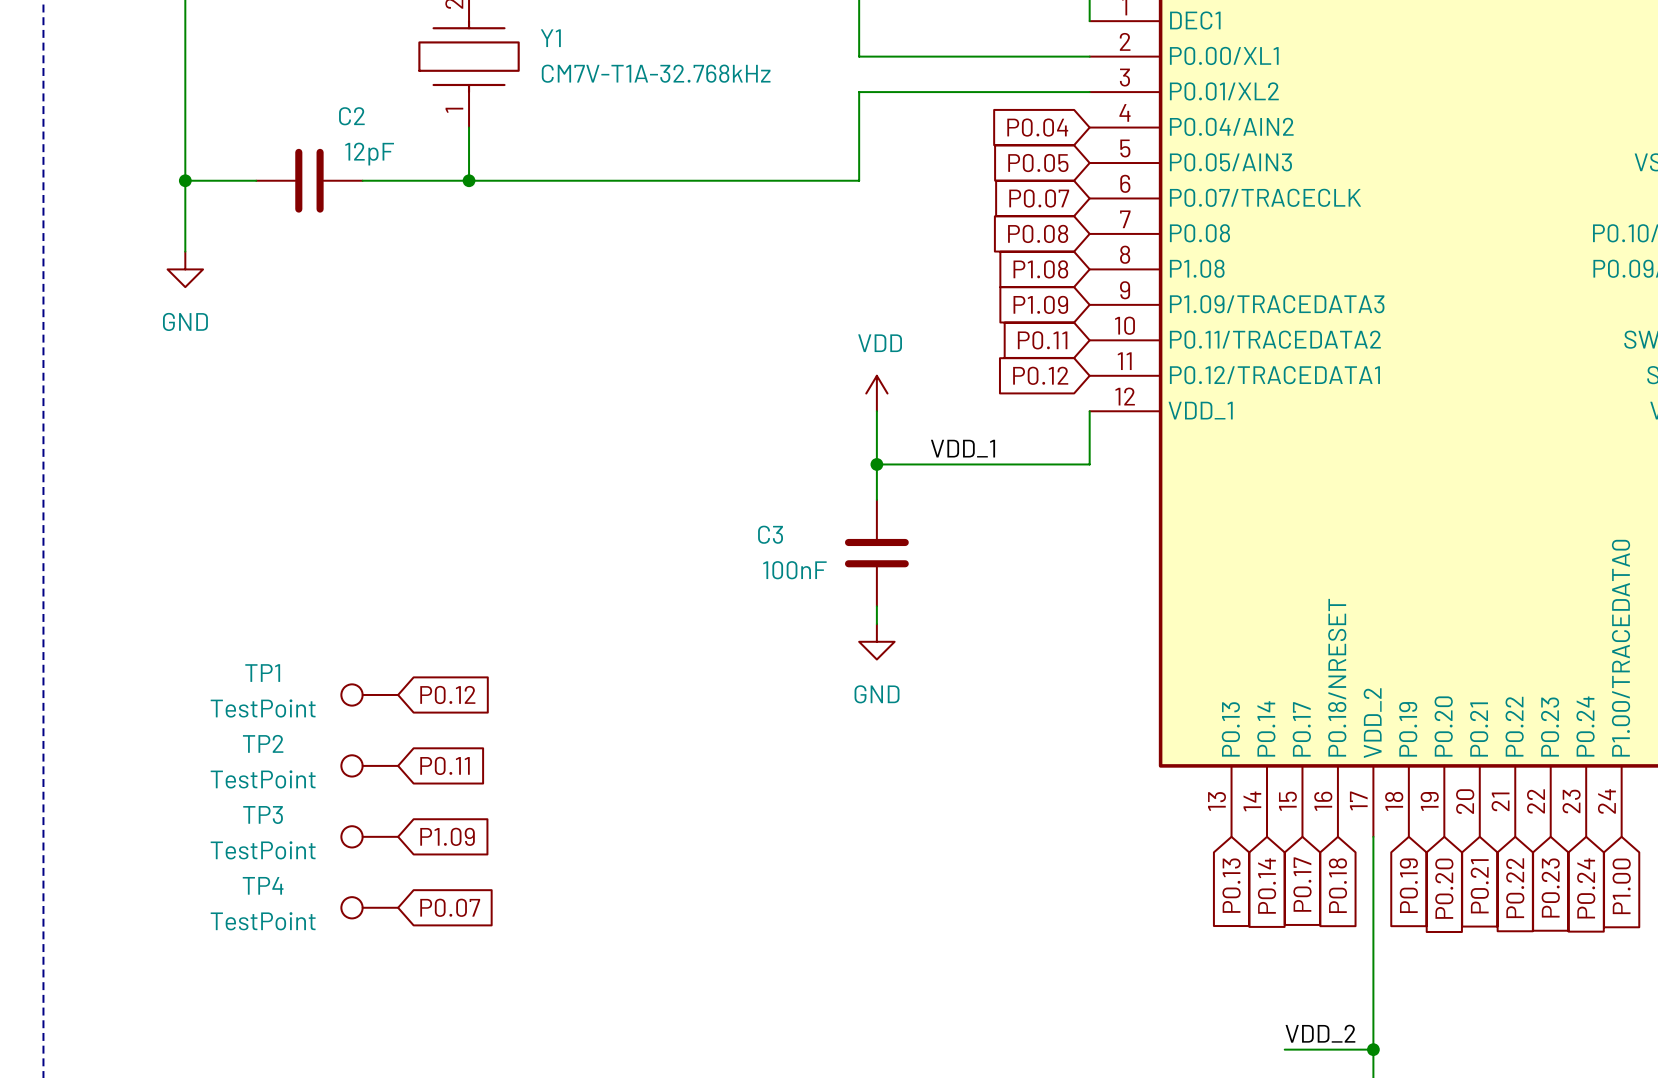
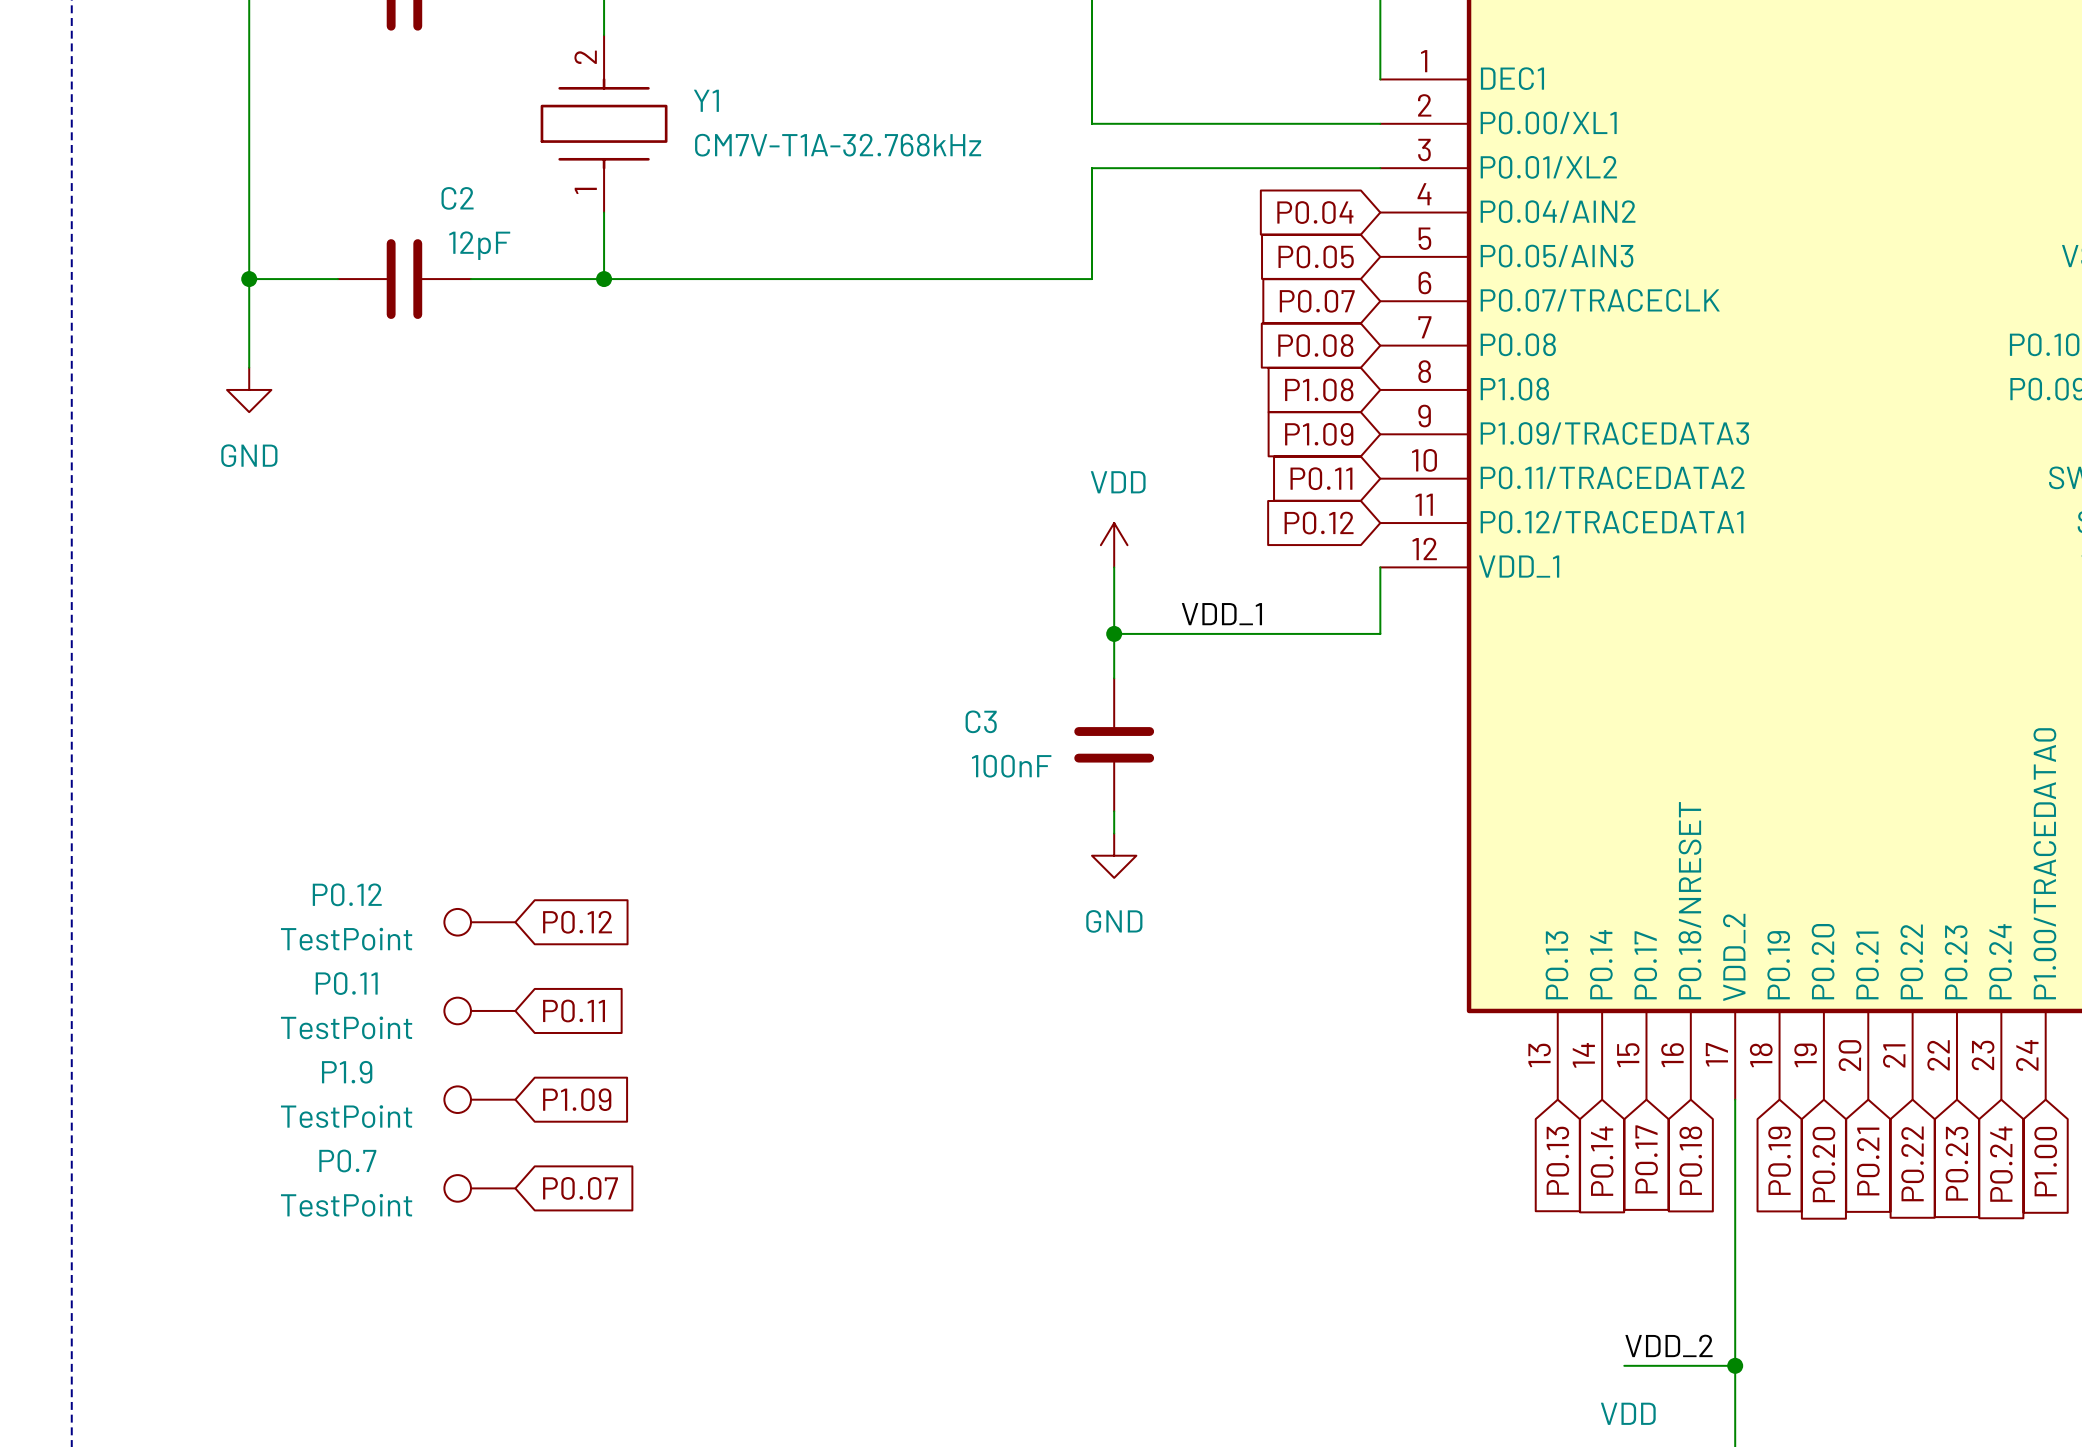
TP1 name: TP1 (262, 673) -> P0.12 (347, 894)
TP2 name: TP2 (263, 743) -> P0.11 (346, 983)
TP3 name: TP3 (263, 814) -> P1.9 (347, 1072)
TP4 name: TP4 (263, 885) -> P0.7 (347, 1160)

